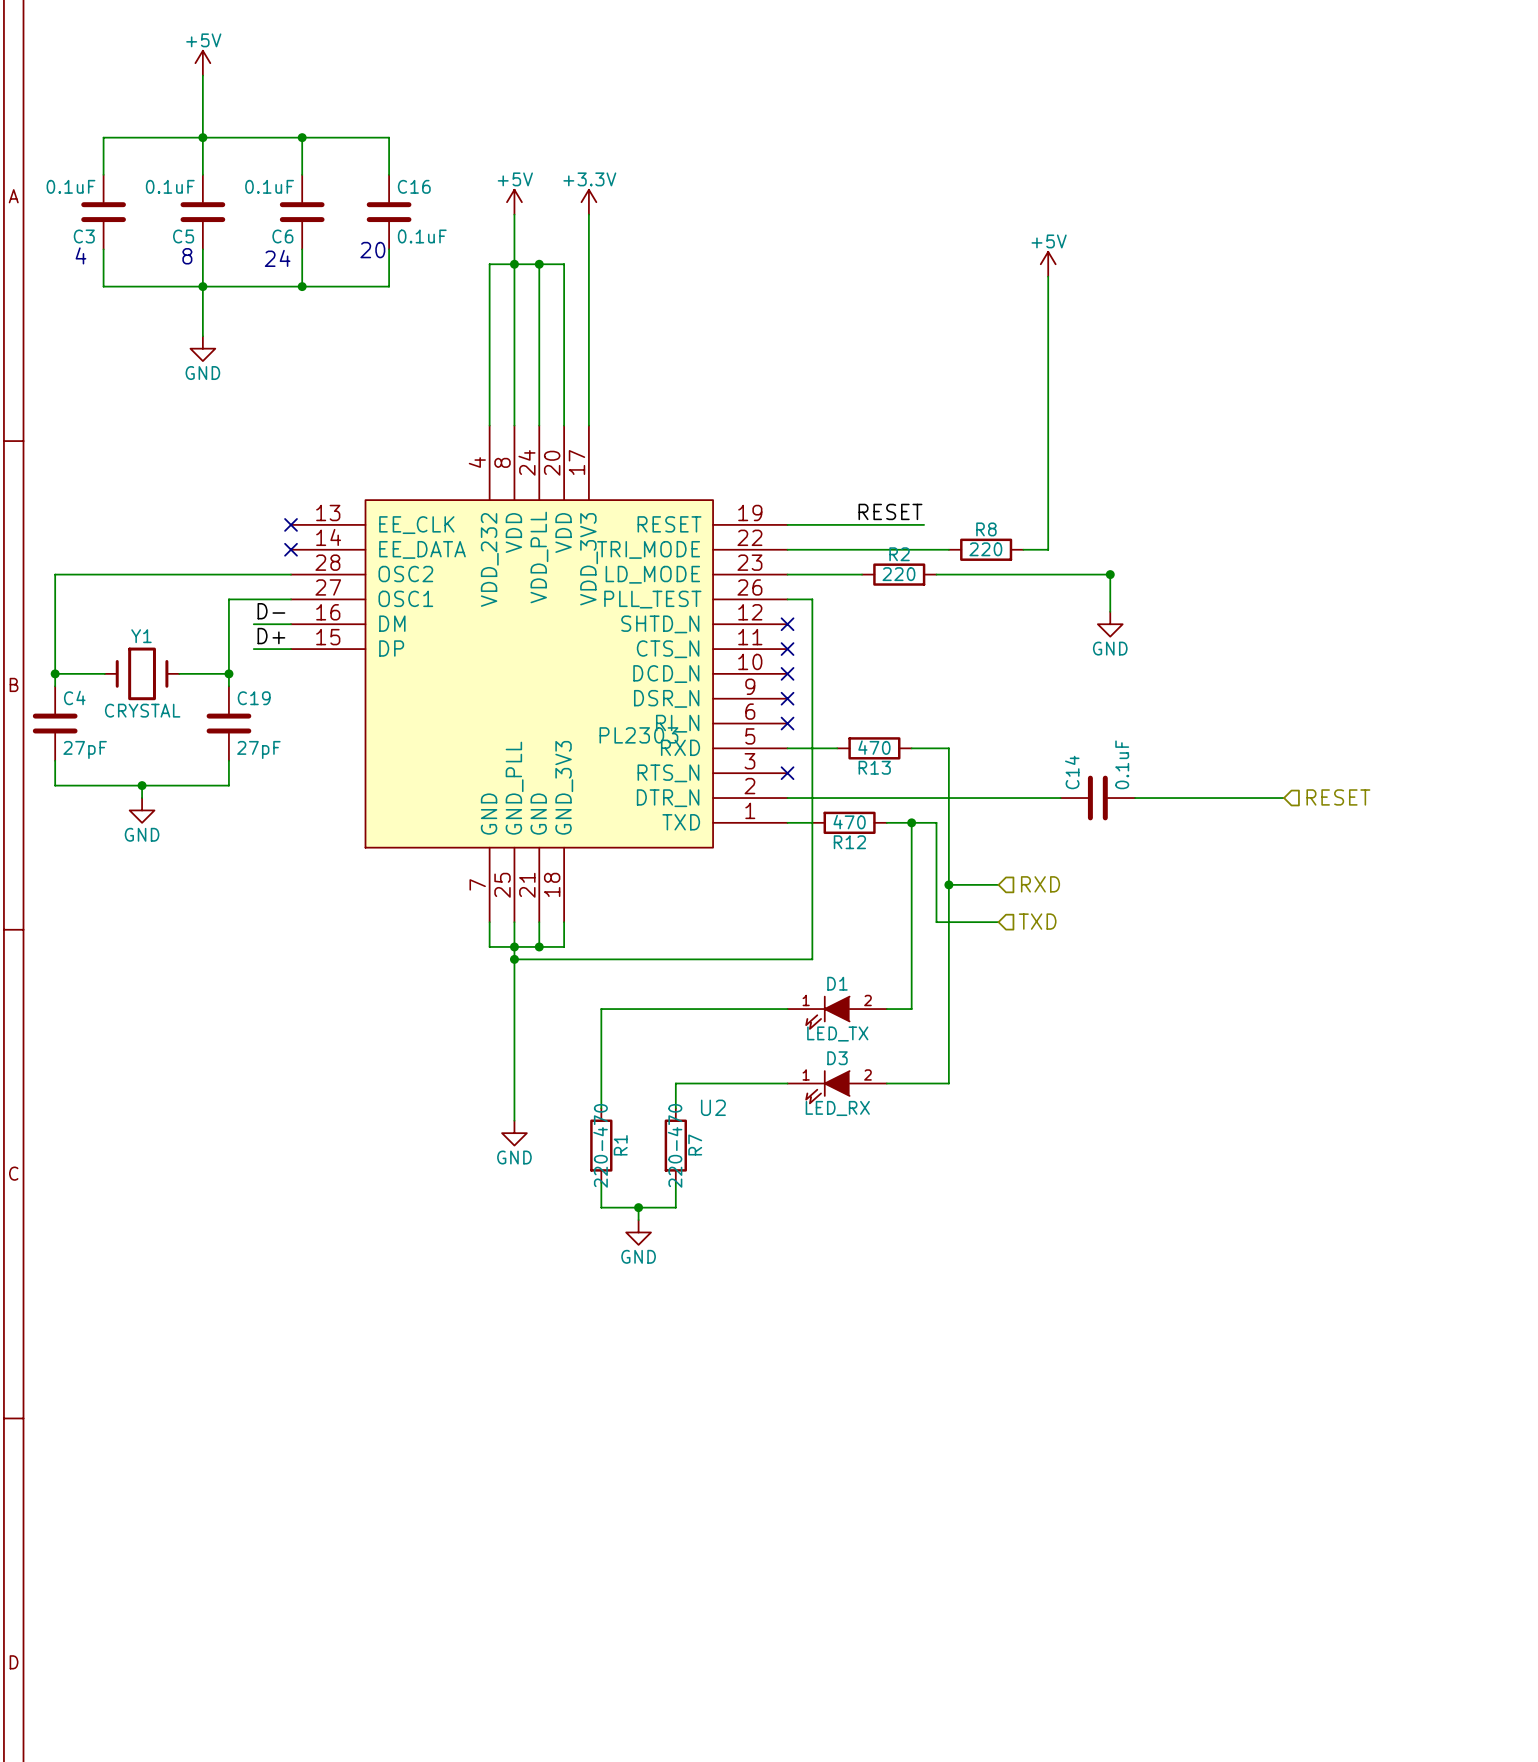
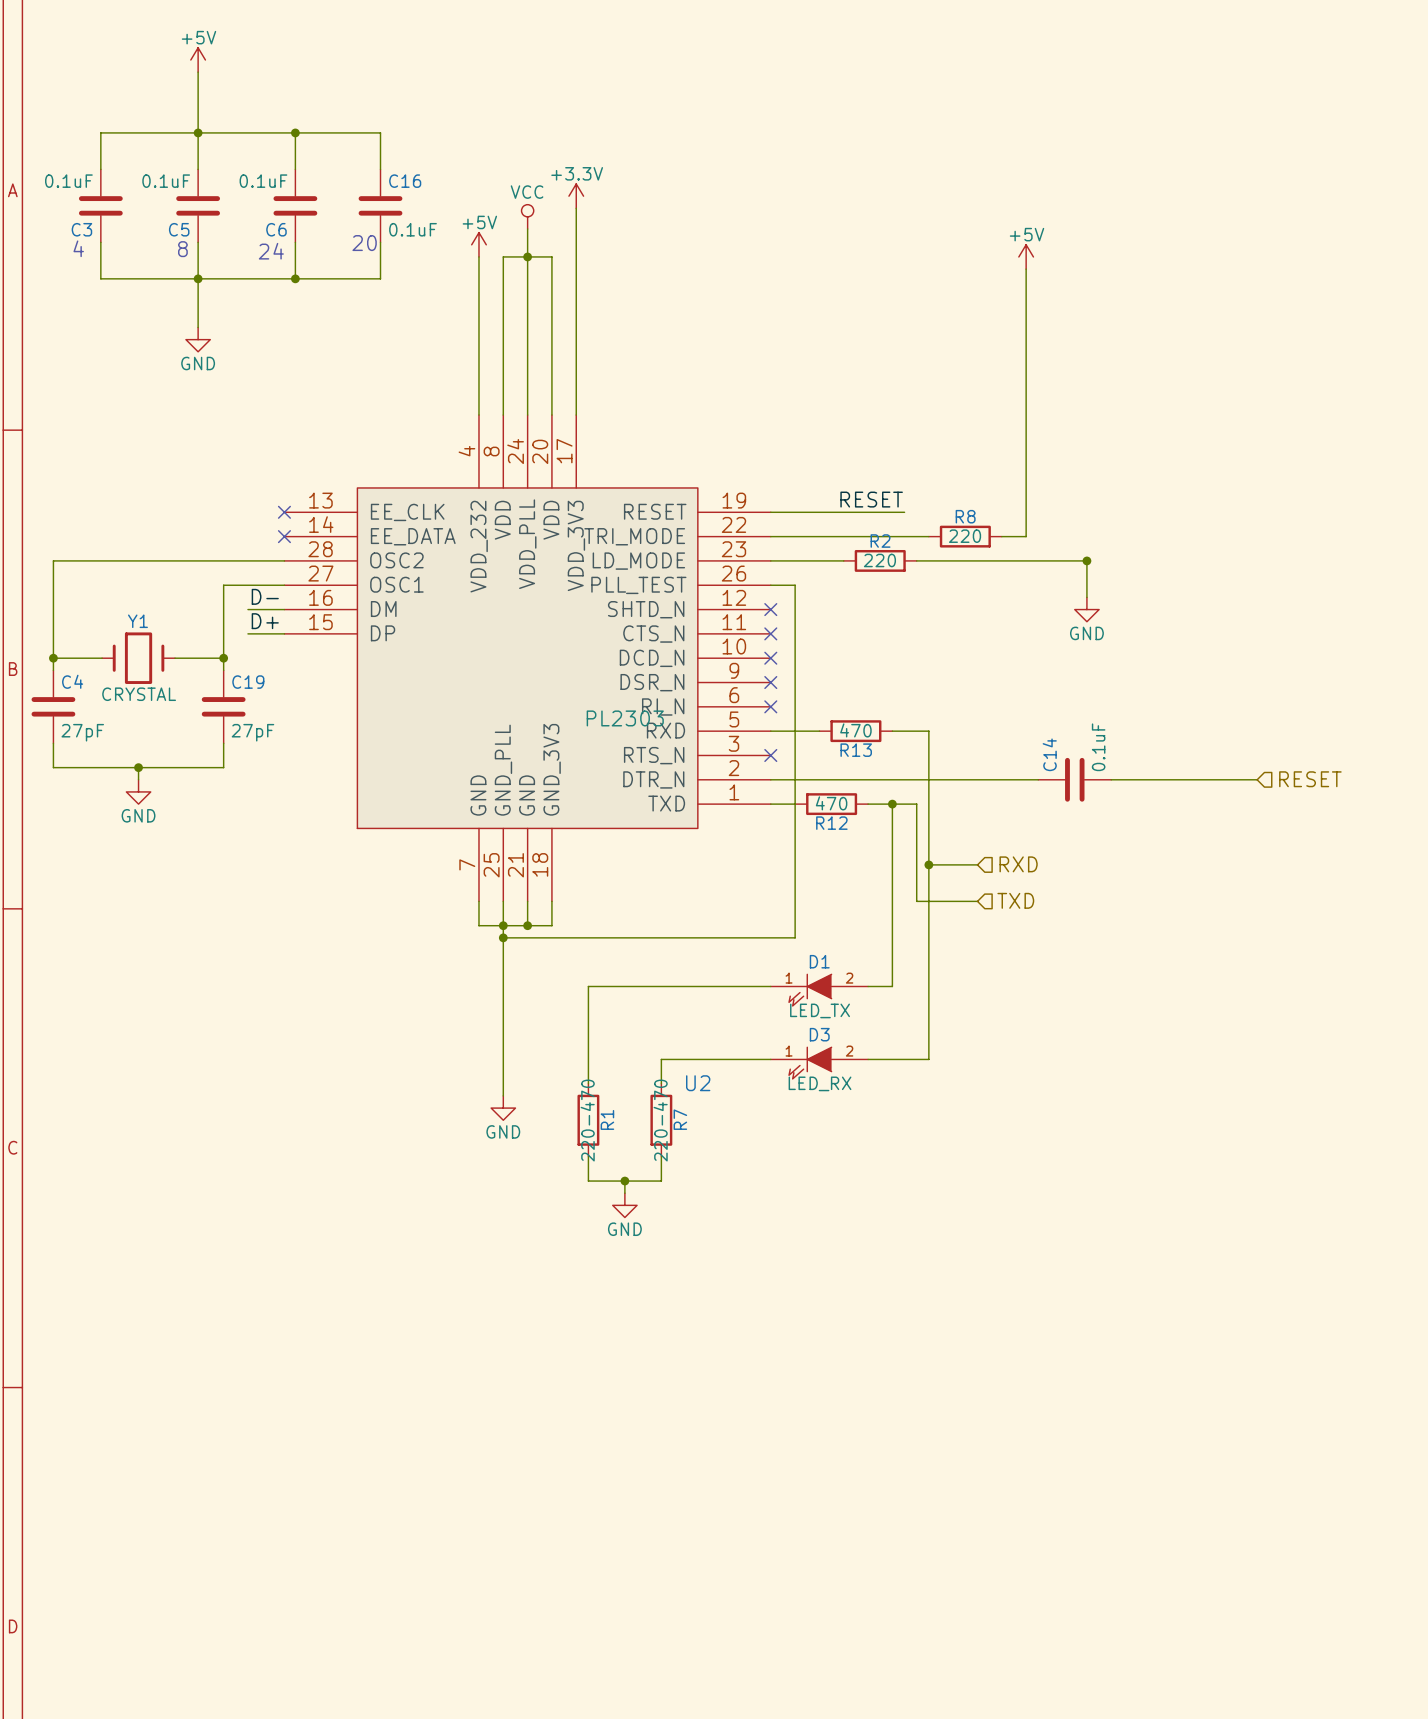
power symbol position: +5V (514, 202) -> +5V (478, 244)
wire: (514, 214) (514, 264) (489, 264) -> none
power symbol: none -> VCC (527, 216)
wire: none -> (527, 228) (527, 256)
junction: (514, 264) -> none

